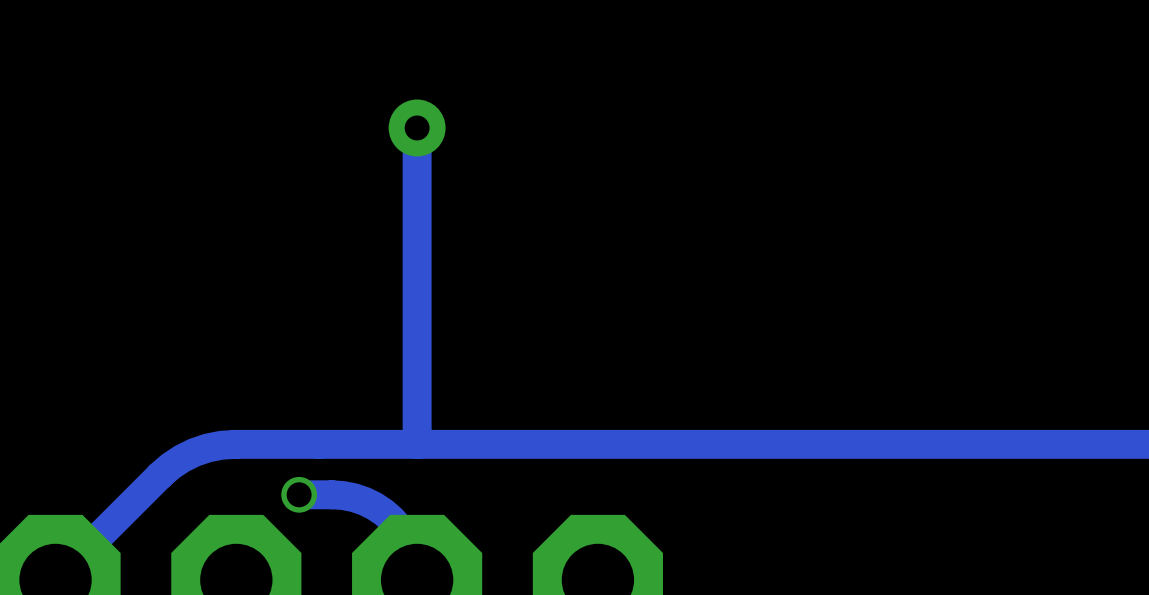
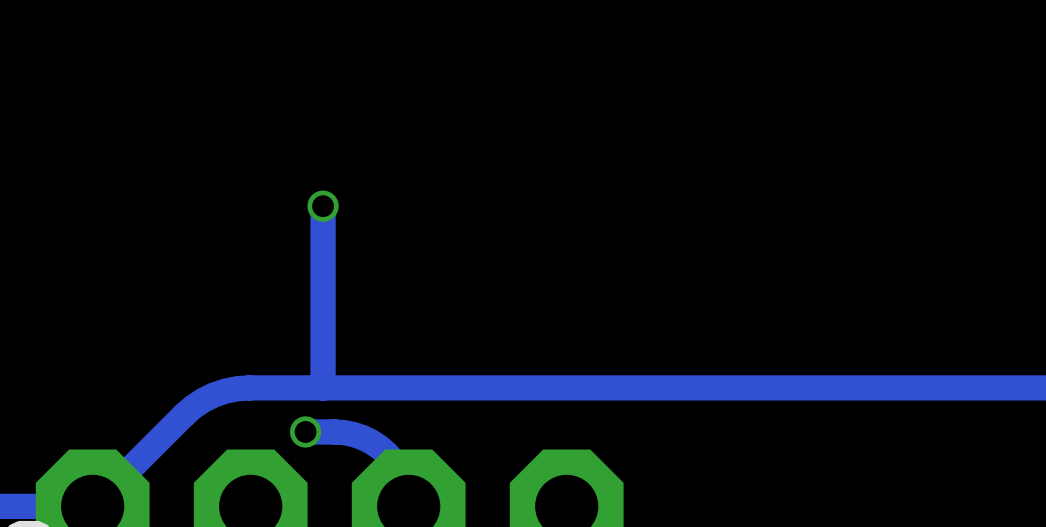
track: (417, 127) (417, 444) -> none
via: (417, 127) -> none
track: none -> (323, 206) (323, 387)
via: none -> (323, 206)

